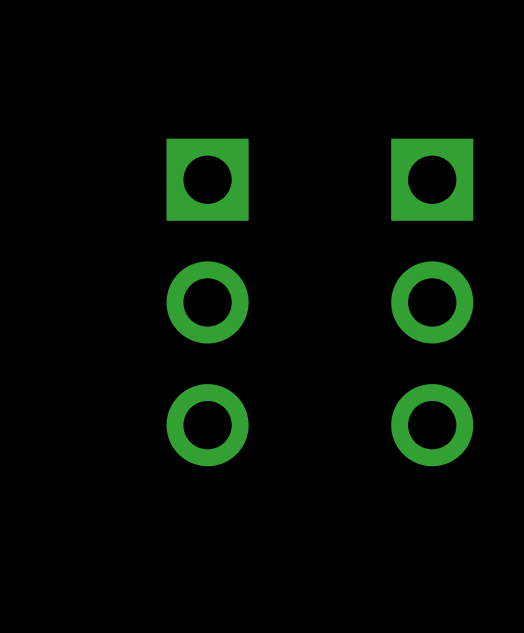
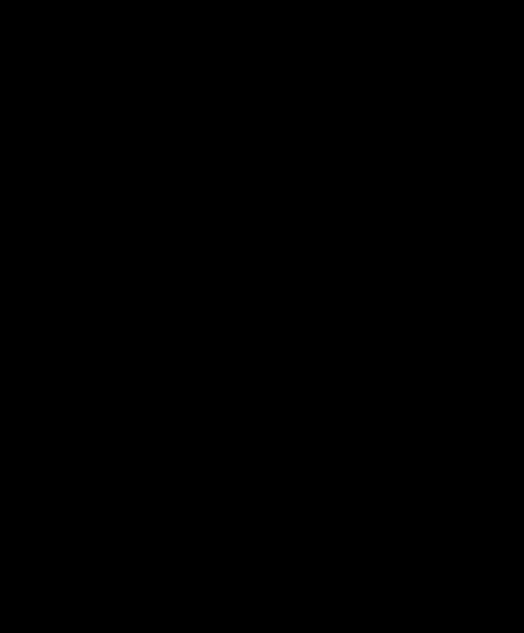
part: (207, 302) -> none
part: (432, 302) -> none

